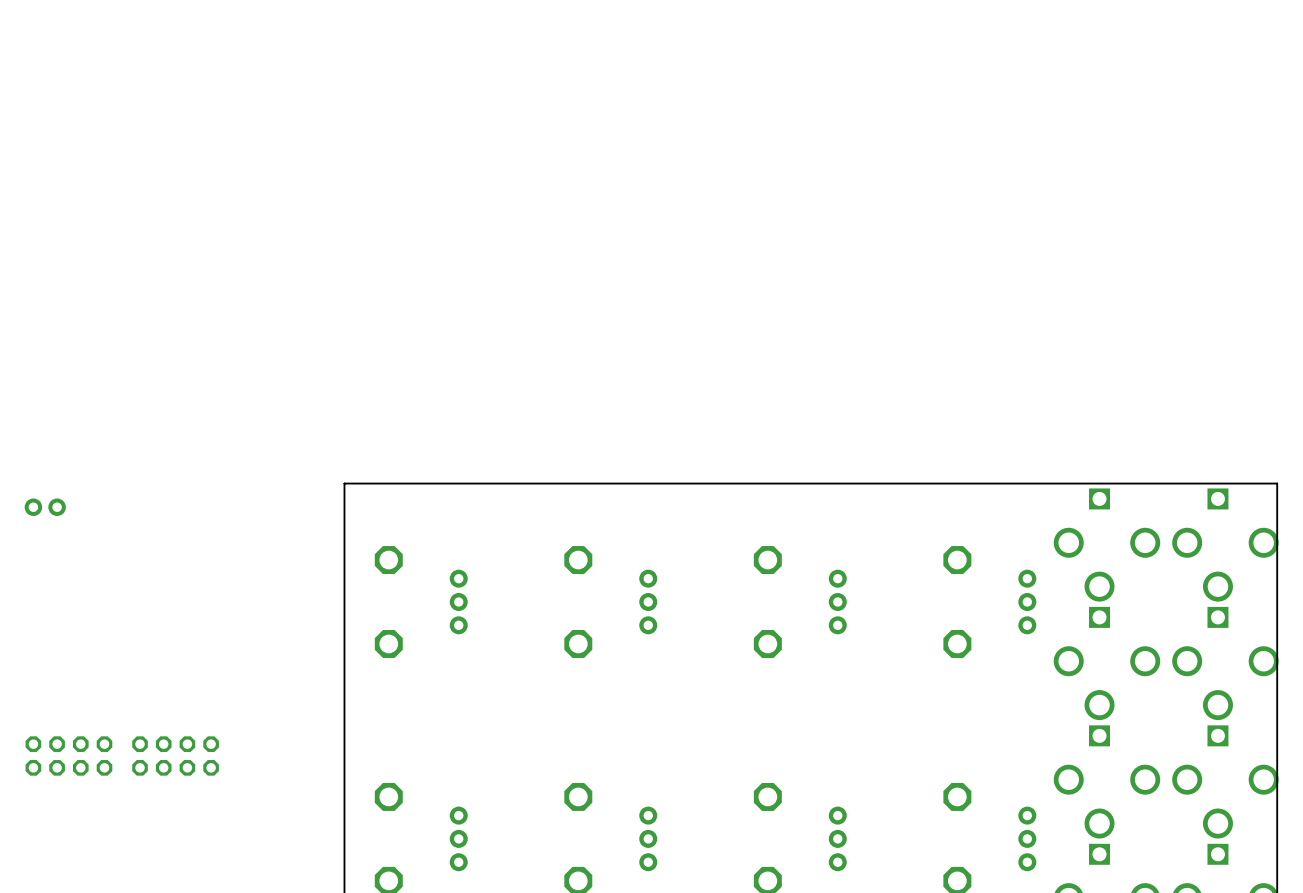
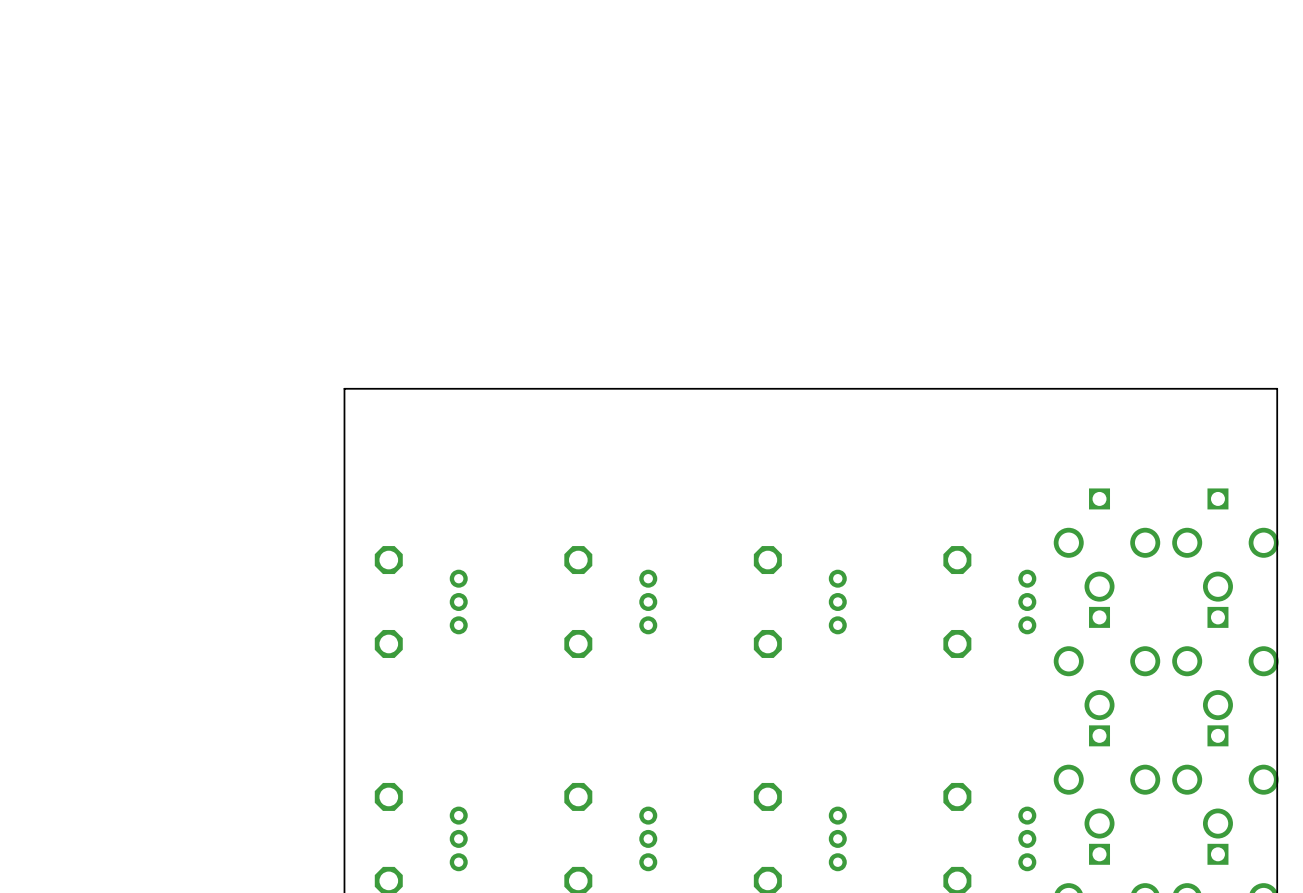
board edge: (1277, 483) (344, 483) -> (1277, 483) (1277, 388) (344, 388) (344, 483)
part: (45, 507) -> none
part: (68, 755) -> none
part: (175, 755) -> none

